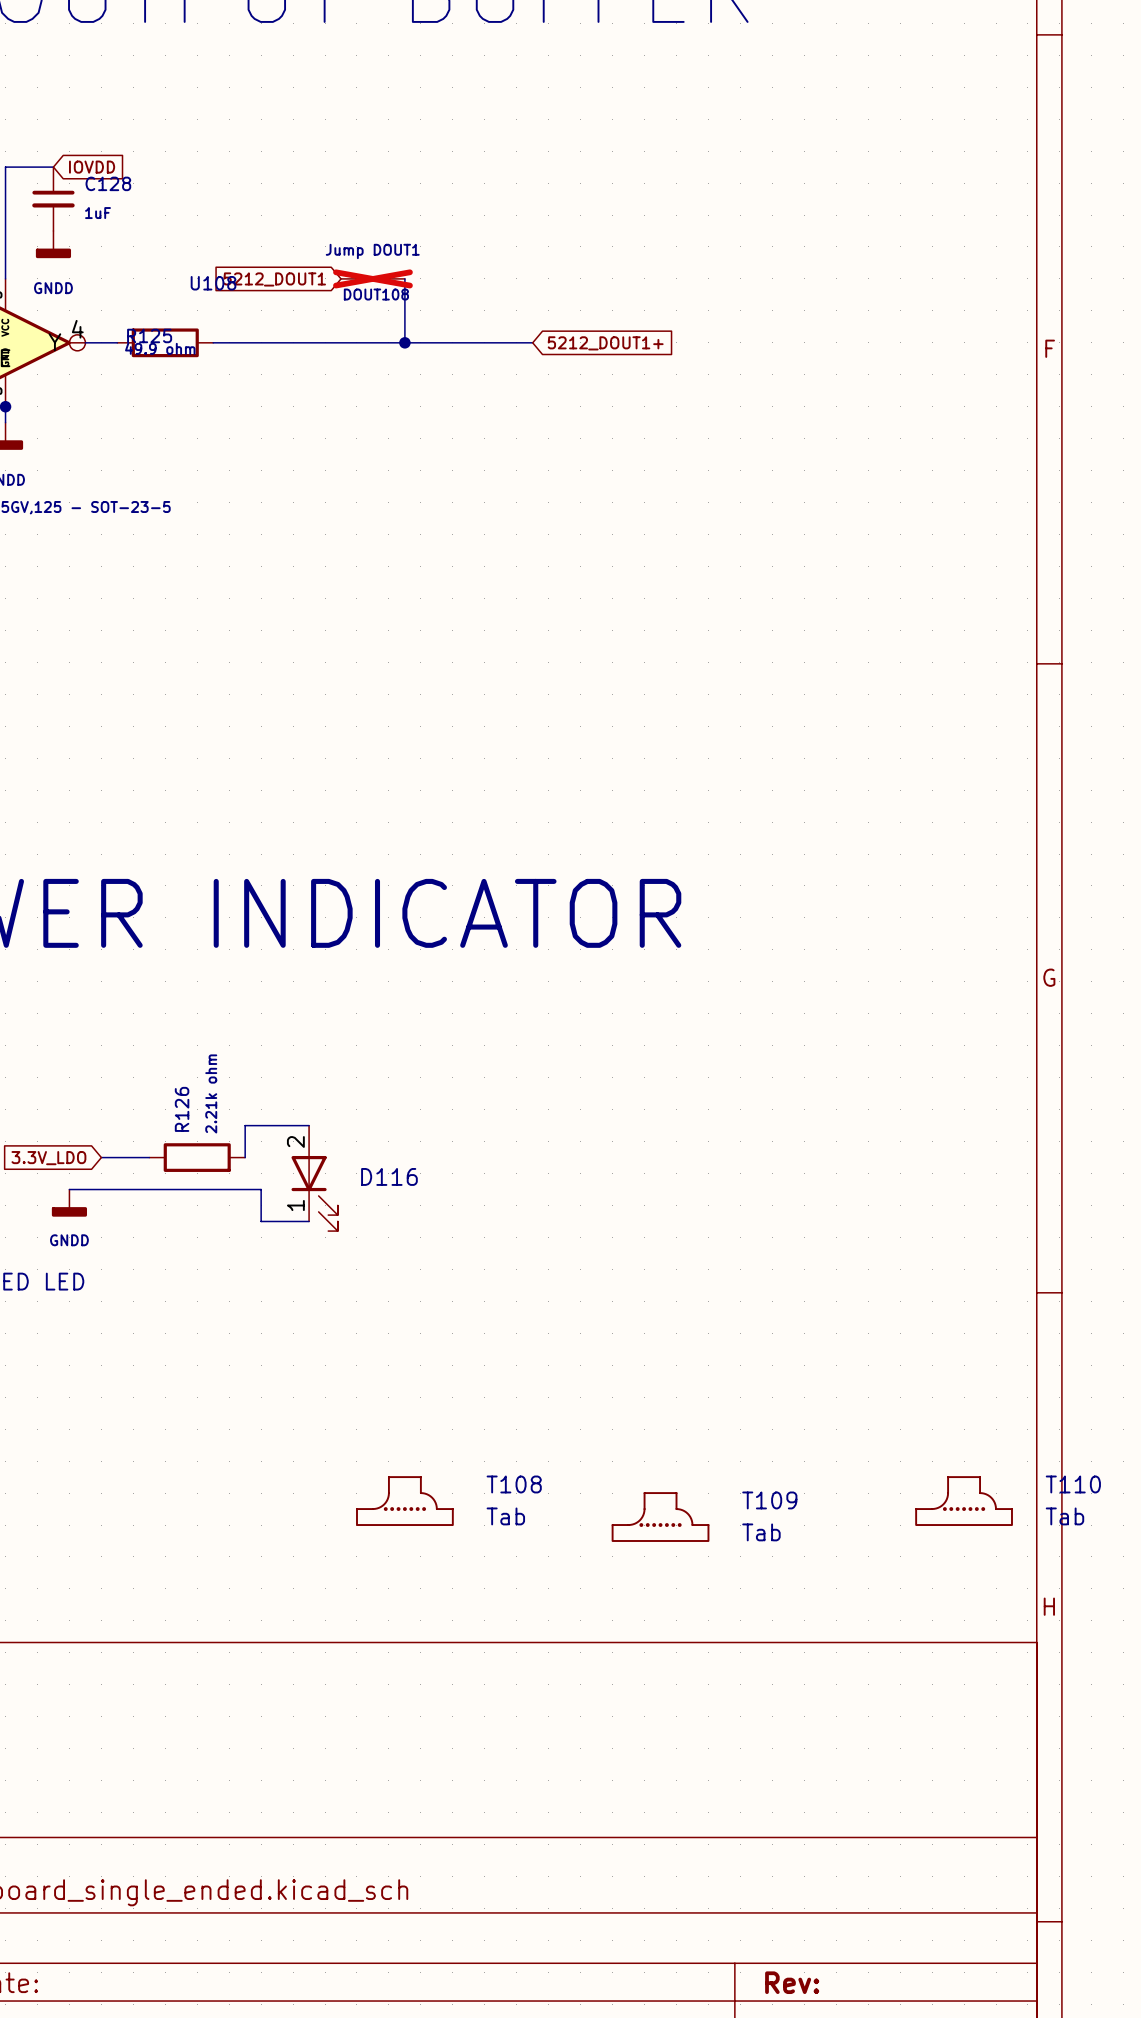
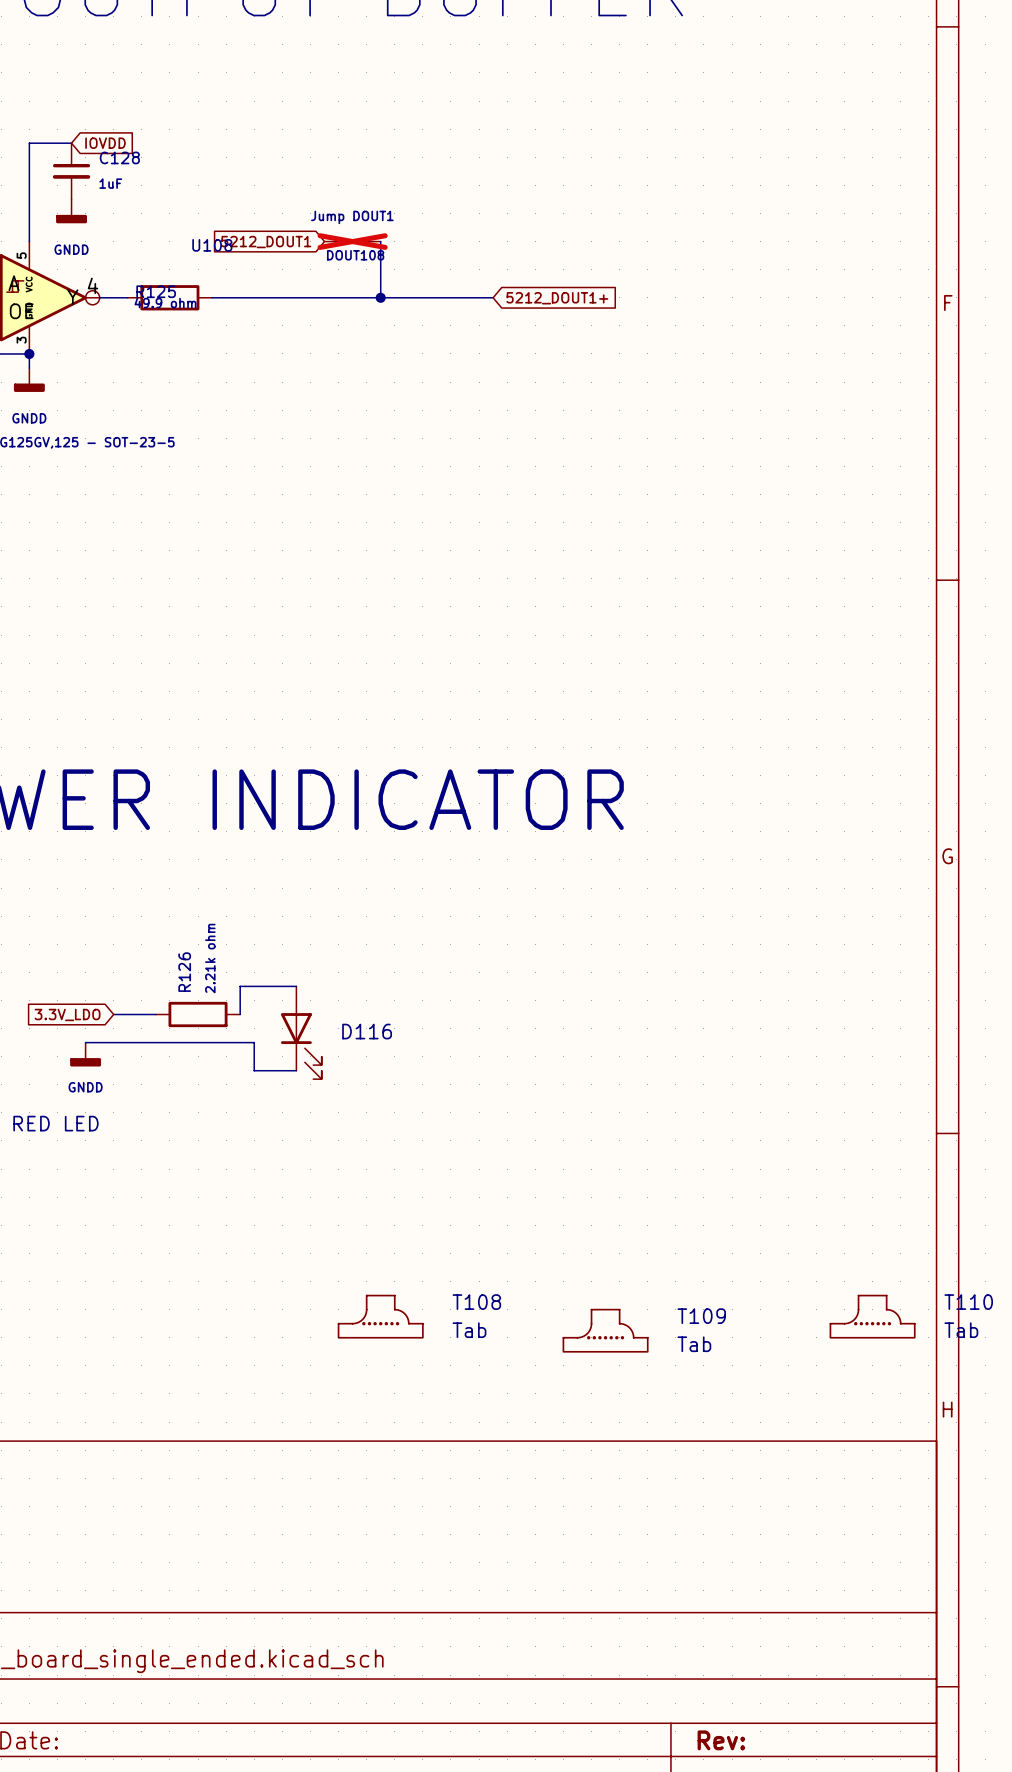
D116 pin number: 2 (295, 1141) -> none
D116 pin number: 1 (295, 1205) -> none

